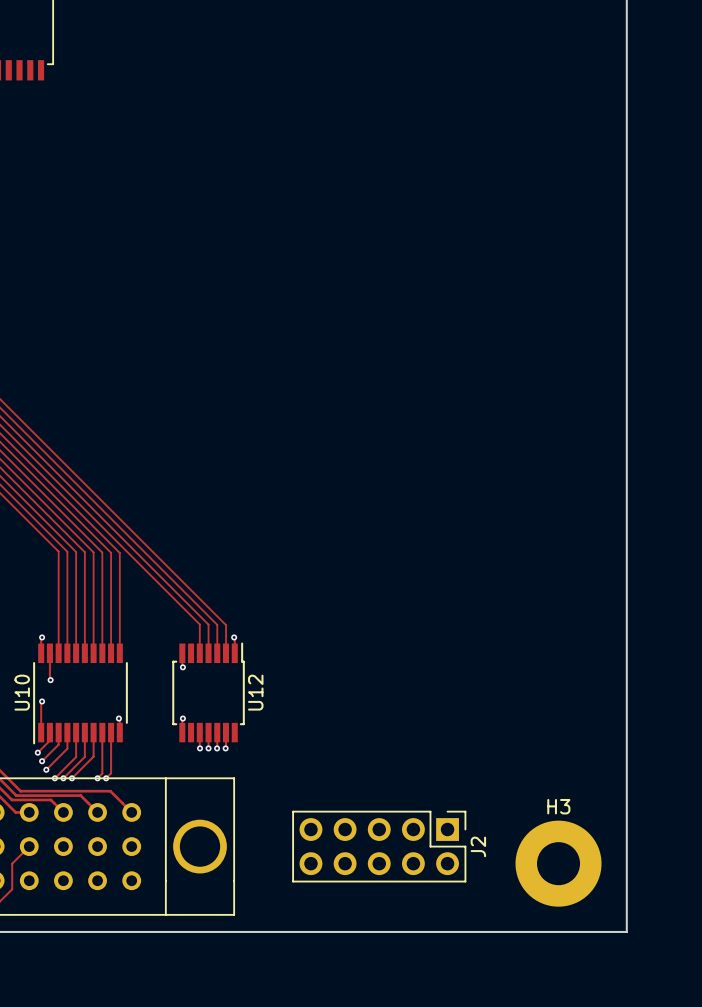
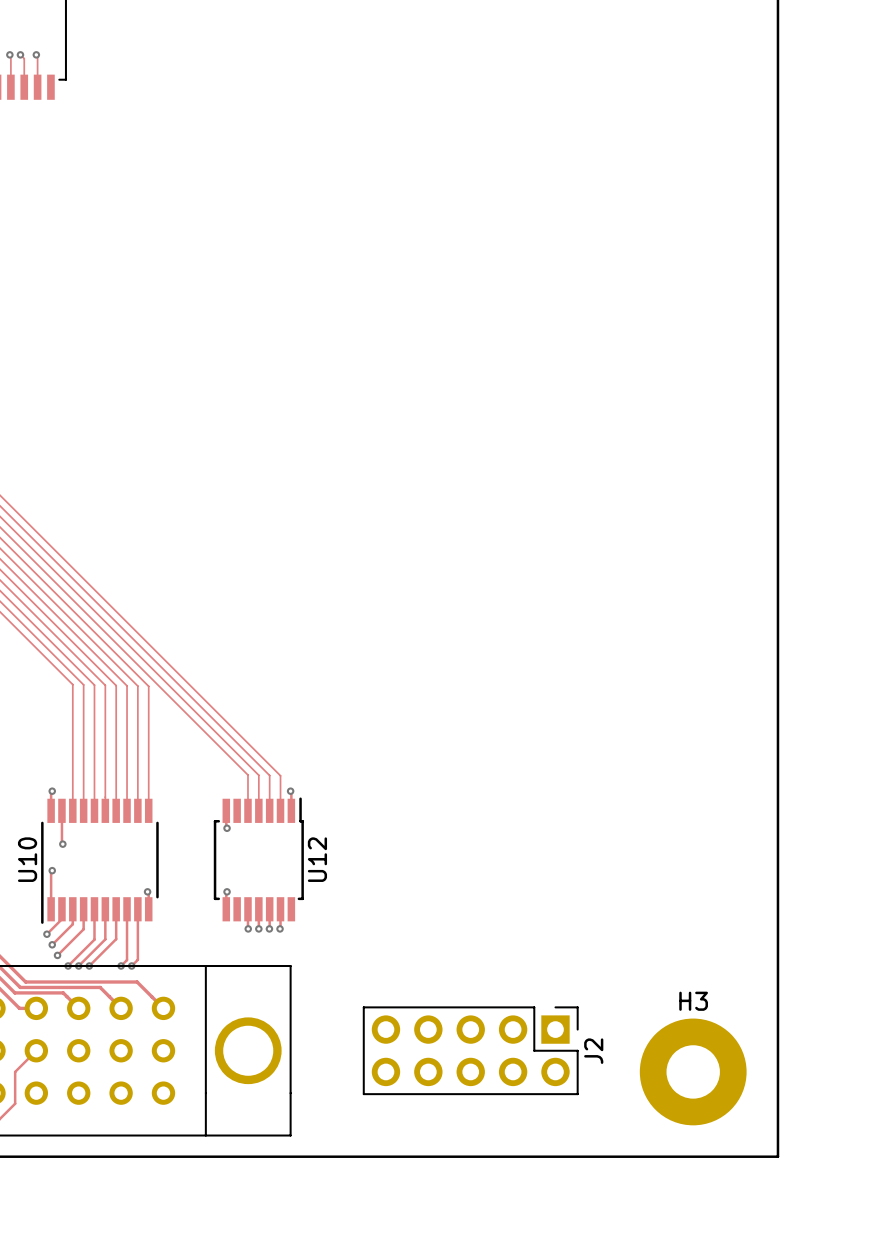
track: none -> (9, 54) (10, 87)
via: none -> (9, 54)
track: none -> (20, 54) (24, 58) (24, 87)
via: none -> (20, 54)
track: none -> (36, 54) (37, 87)
via: none -> (36, 54)

